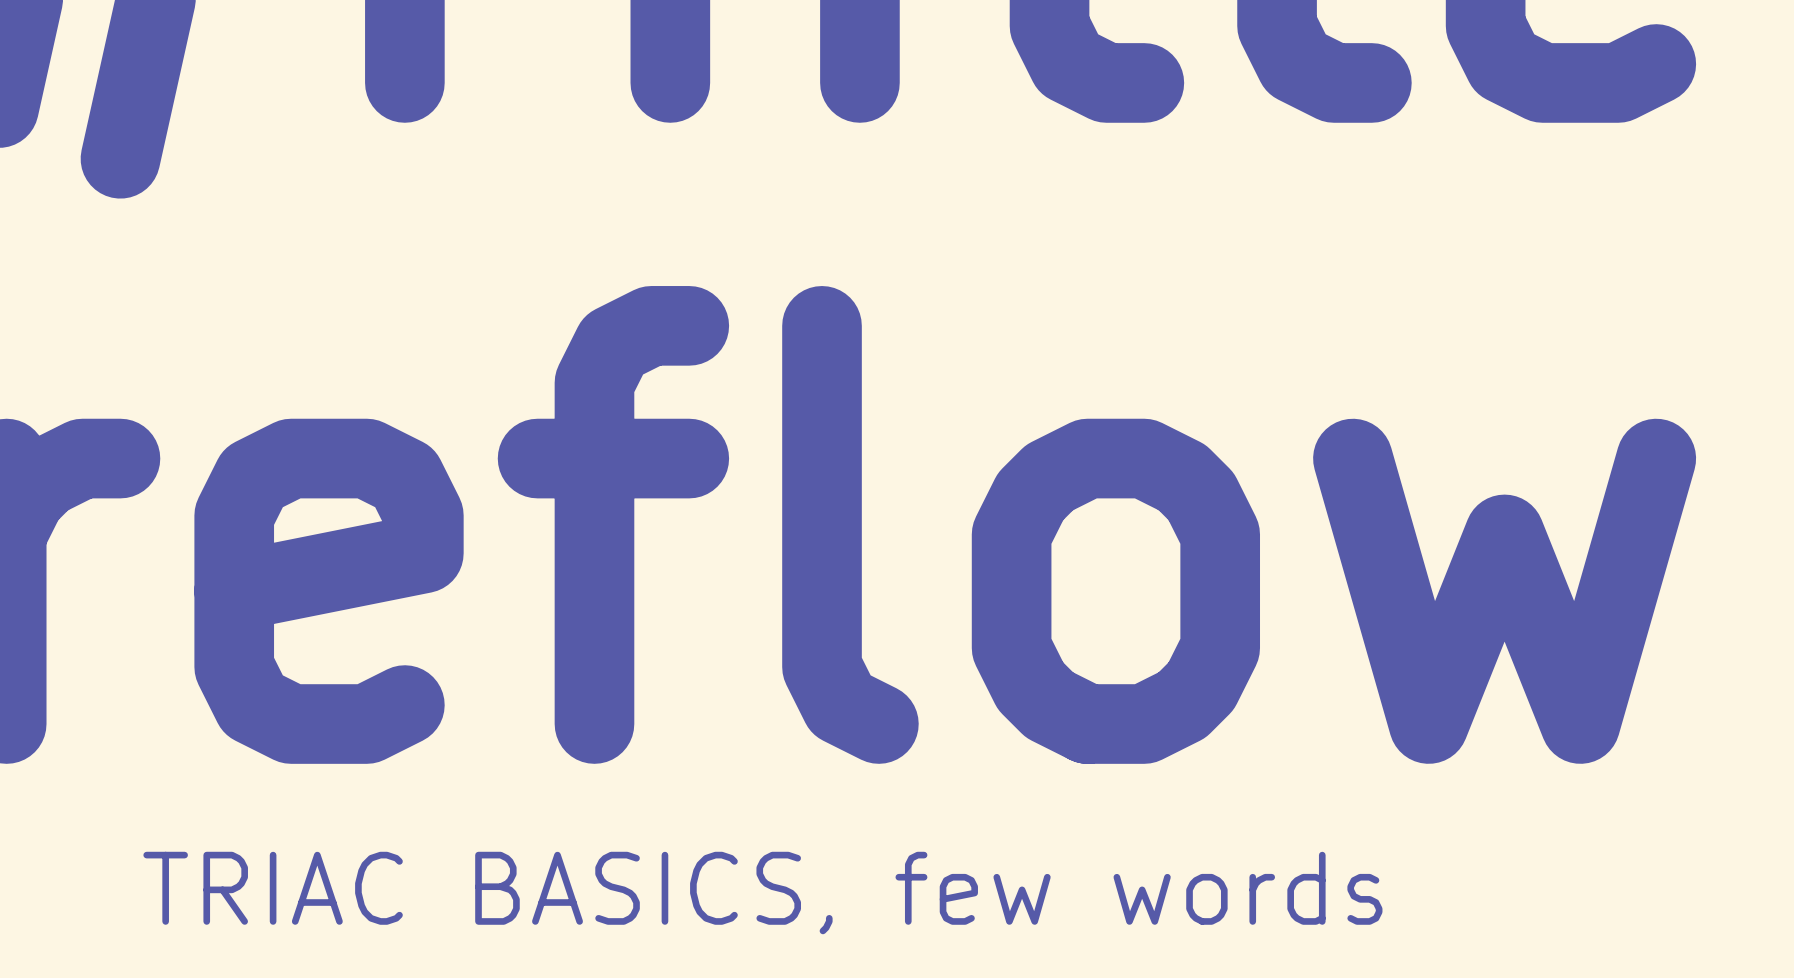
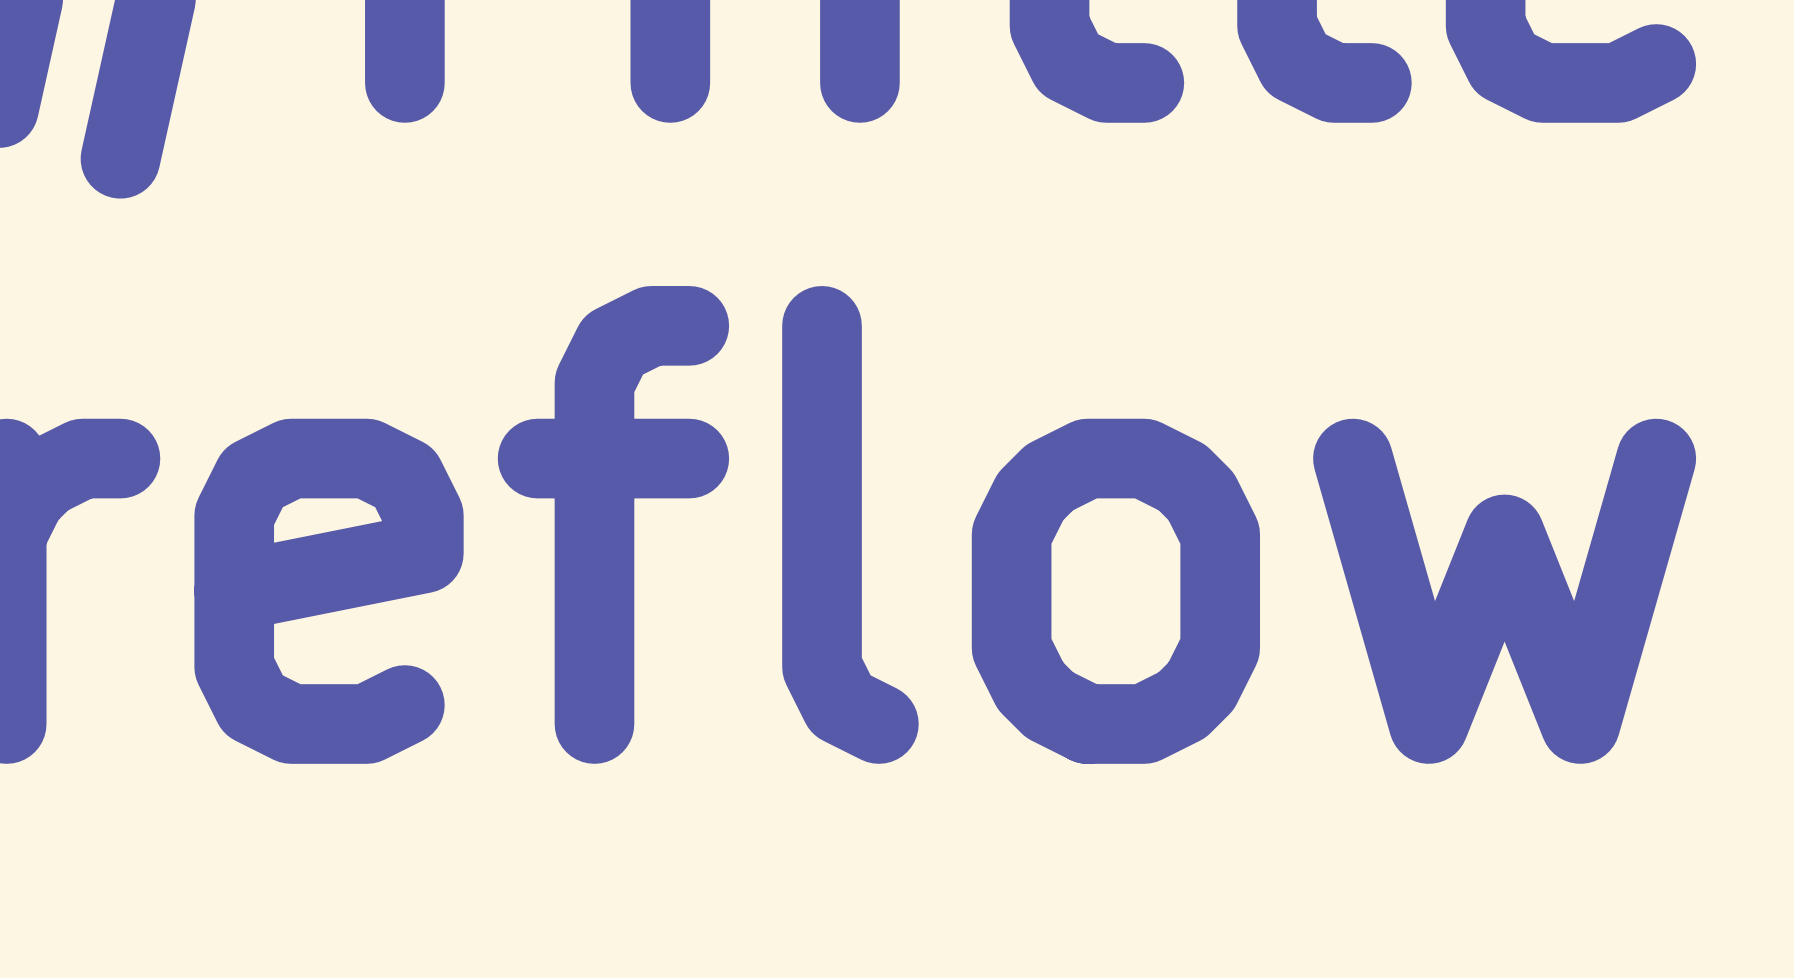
text: TRIAC BASICS, few words (762, 893) -> none

